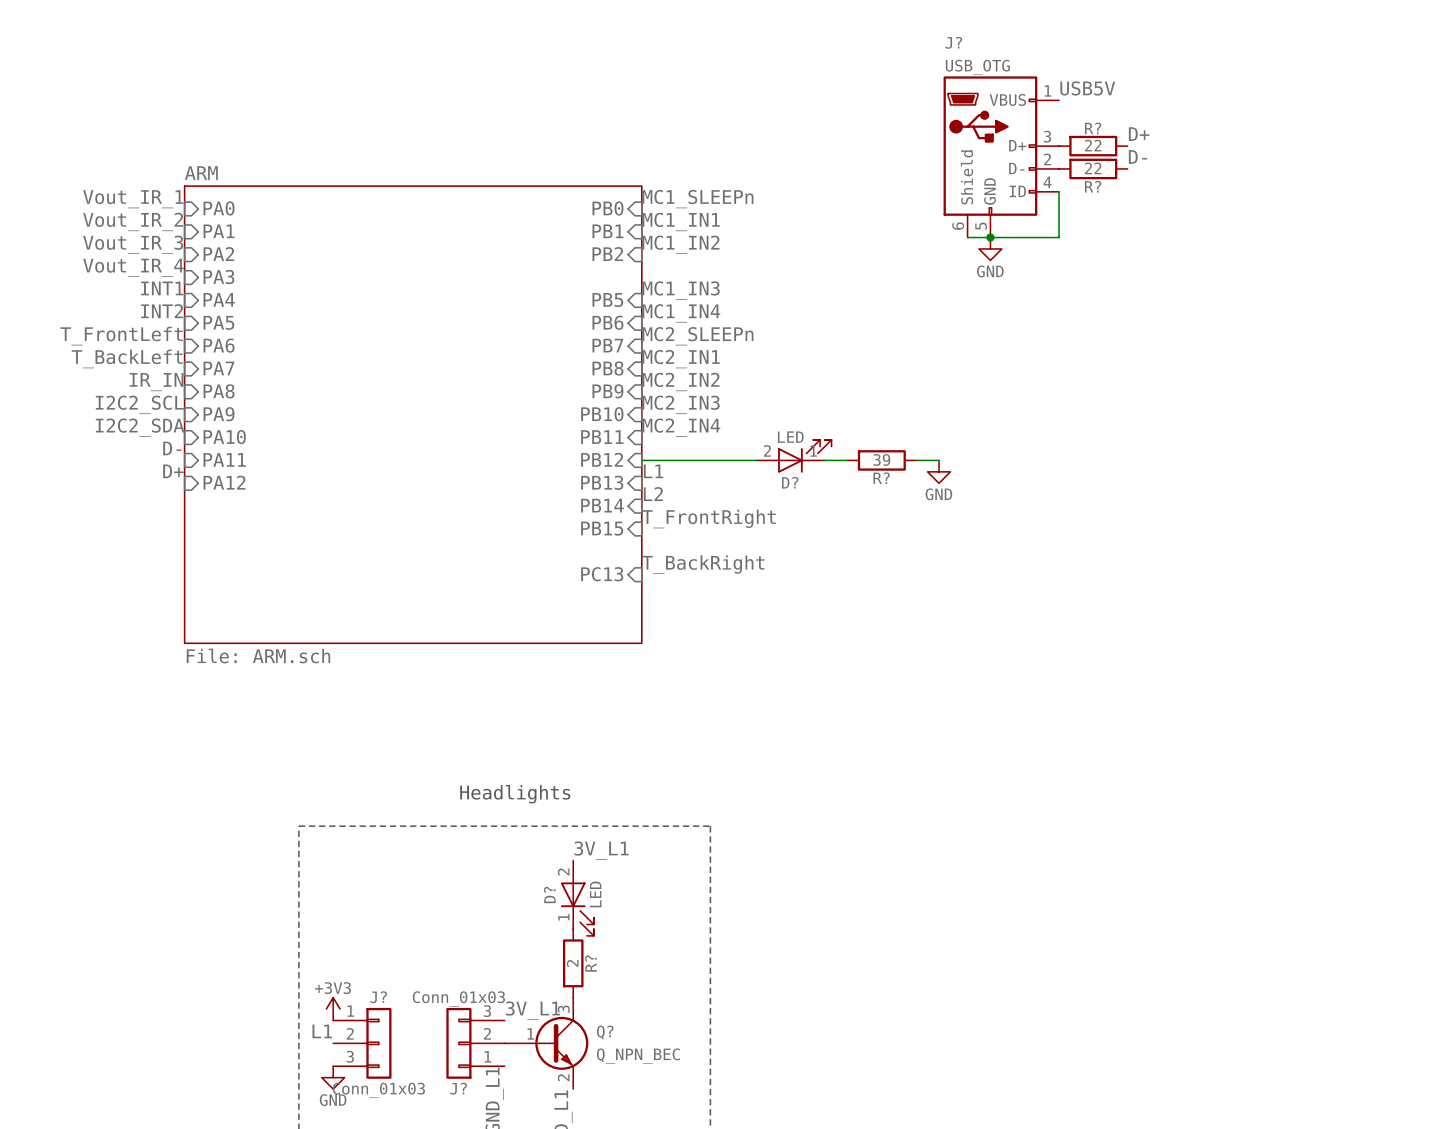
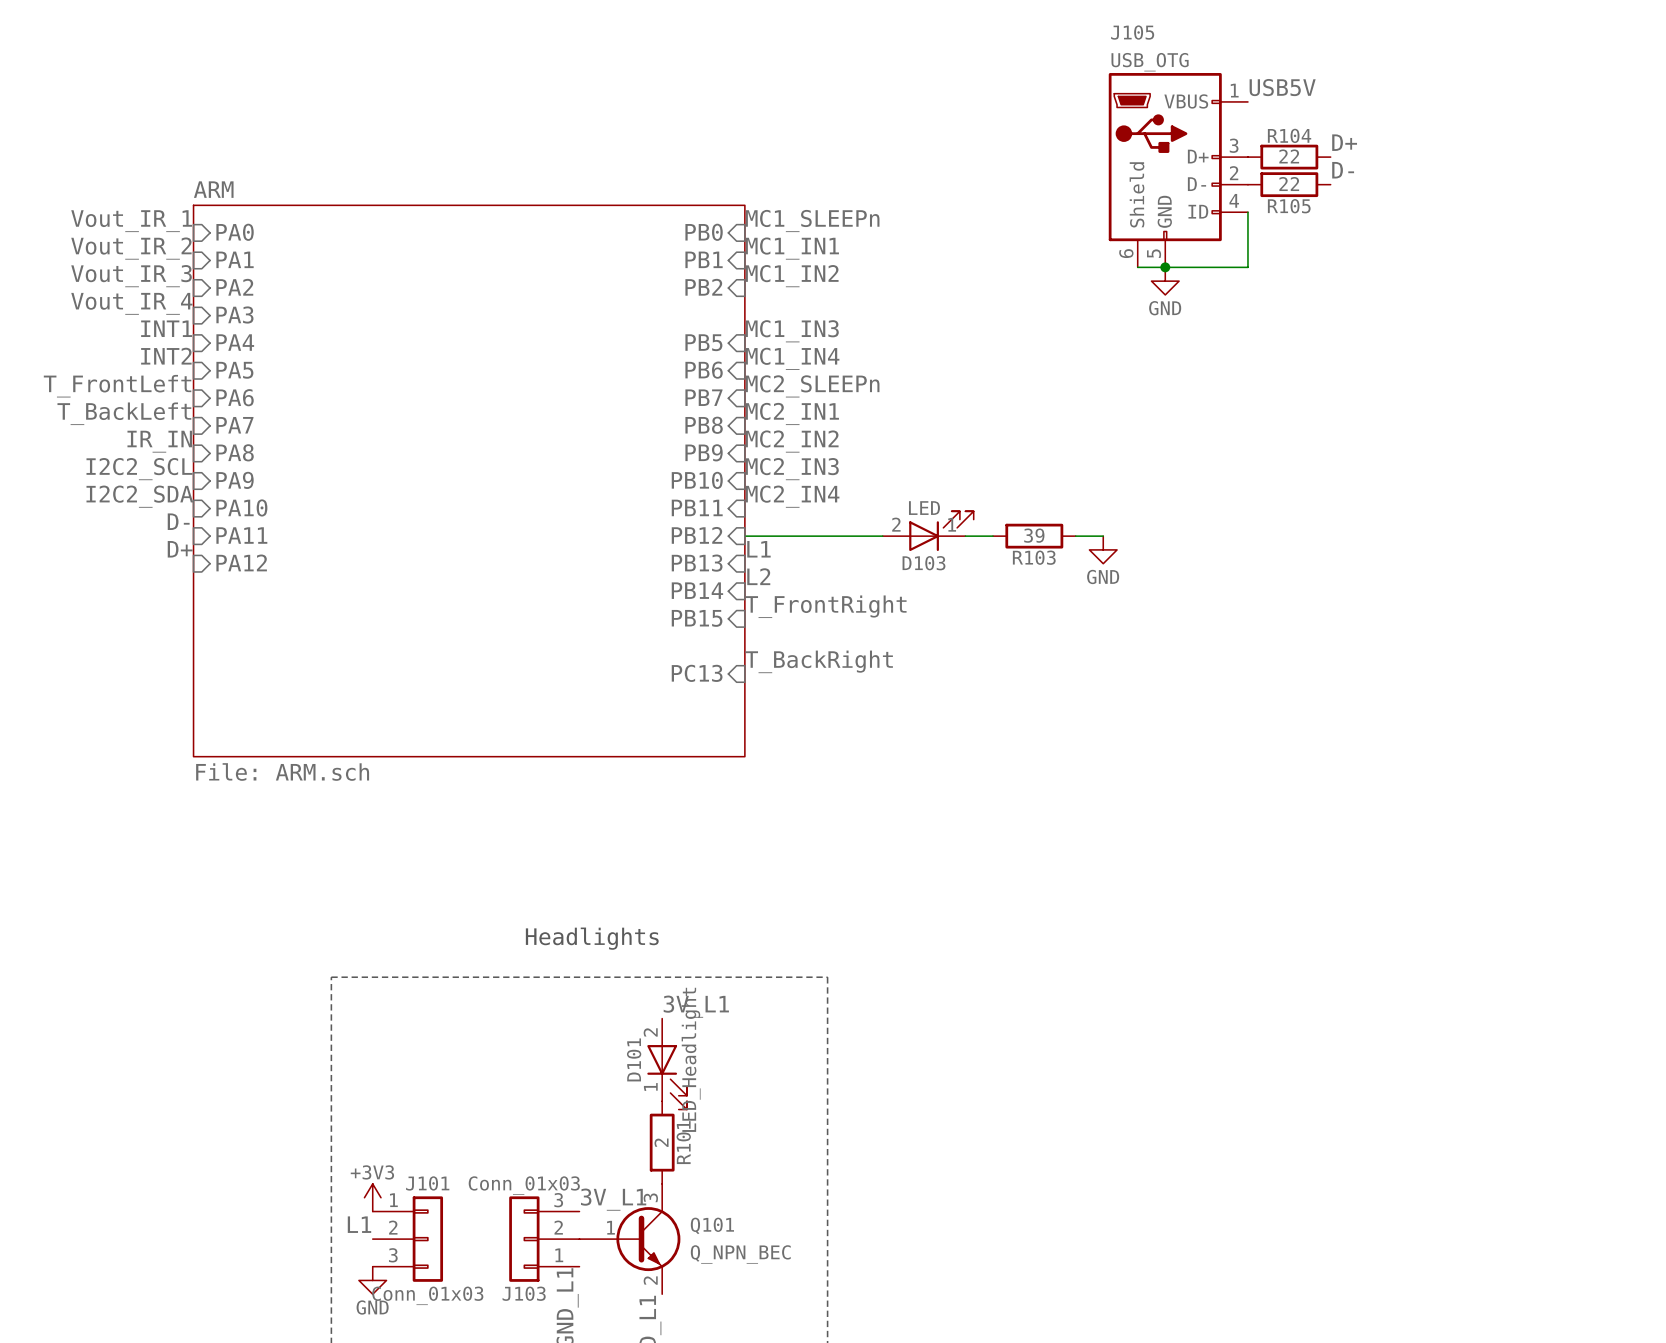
J? name: J? (953, 42) -> J105 (1132, 32)
R? name: R? (1093, 128) -> R104 (1289, 135)
R? name: R? (1093, 186) -> R105 (1289, 206)
R? name: R? (881, 478) -> R103 (1034, 557)
D? name: D? (790, 482) -> D103 (923, 563)
D? name: D? (549, 894) -> D101 (634, 1059)
D? value: LED (595, 894) -> LED_Headlight (691, 1059)
R? name: R? (590, 963) -> R101 (683, 1142)
J? name: J? (378, 997) -> J101 (427, 1183)
Q? name: Q? (605, 1032) -> Q101 (712, 1225)
J? name: J? (458, 1088) -> J103 (524, 1293)

